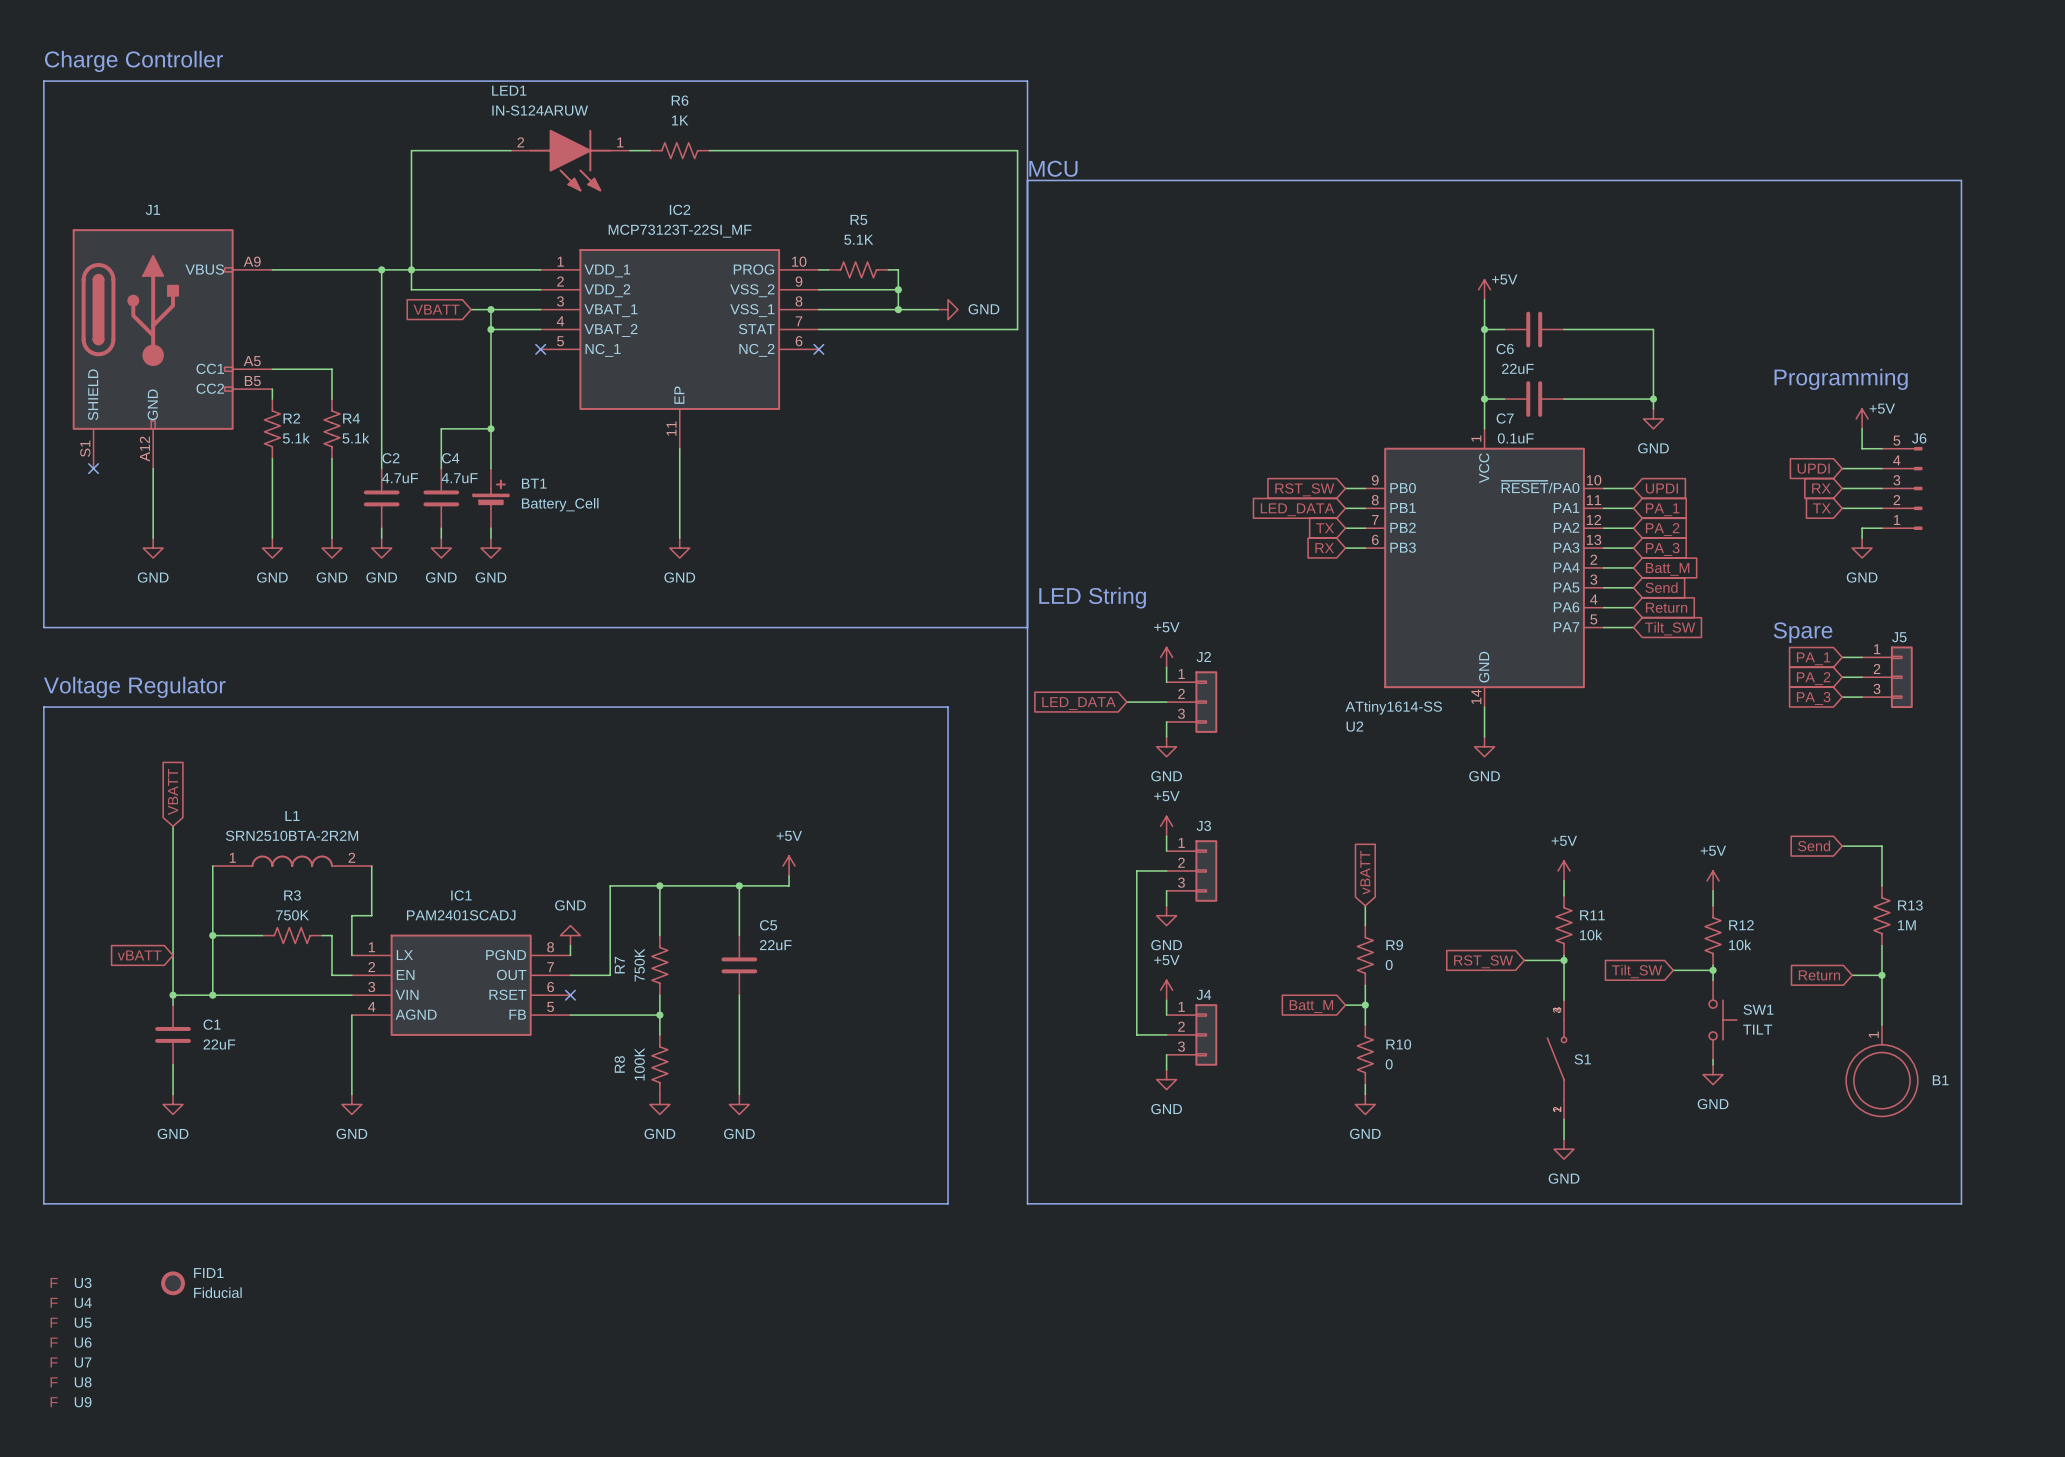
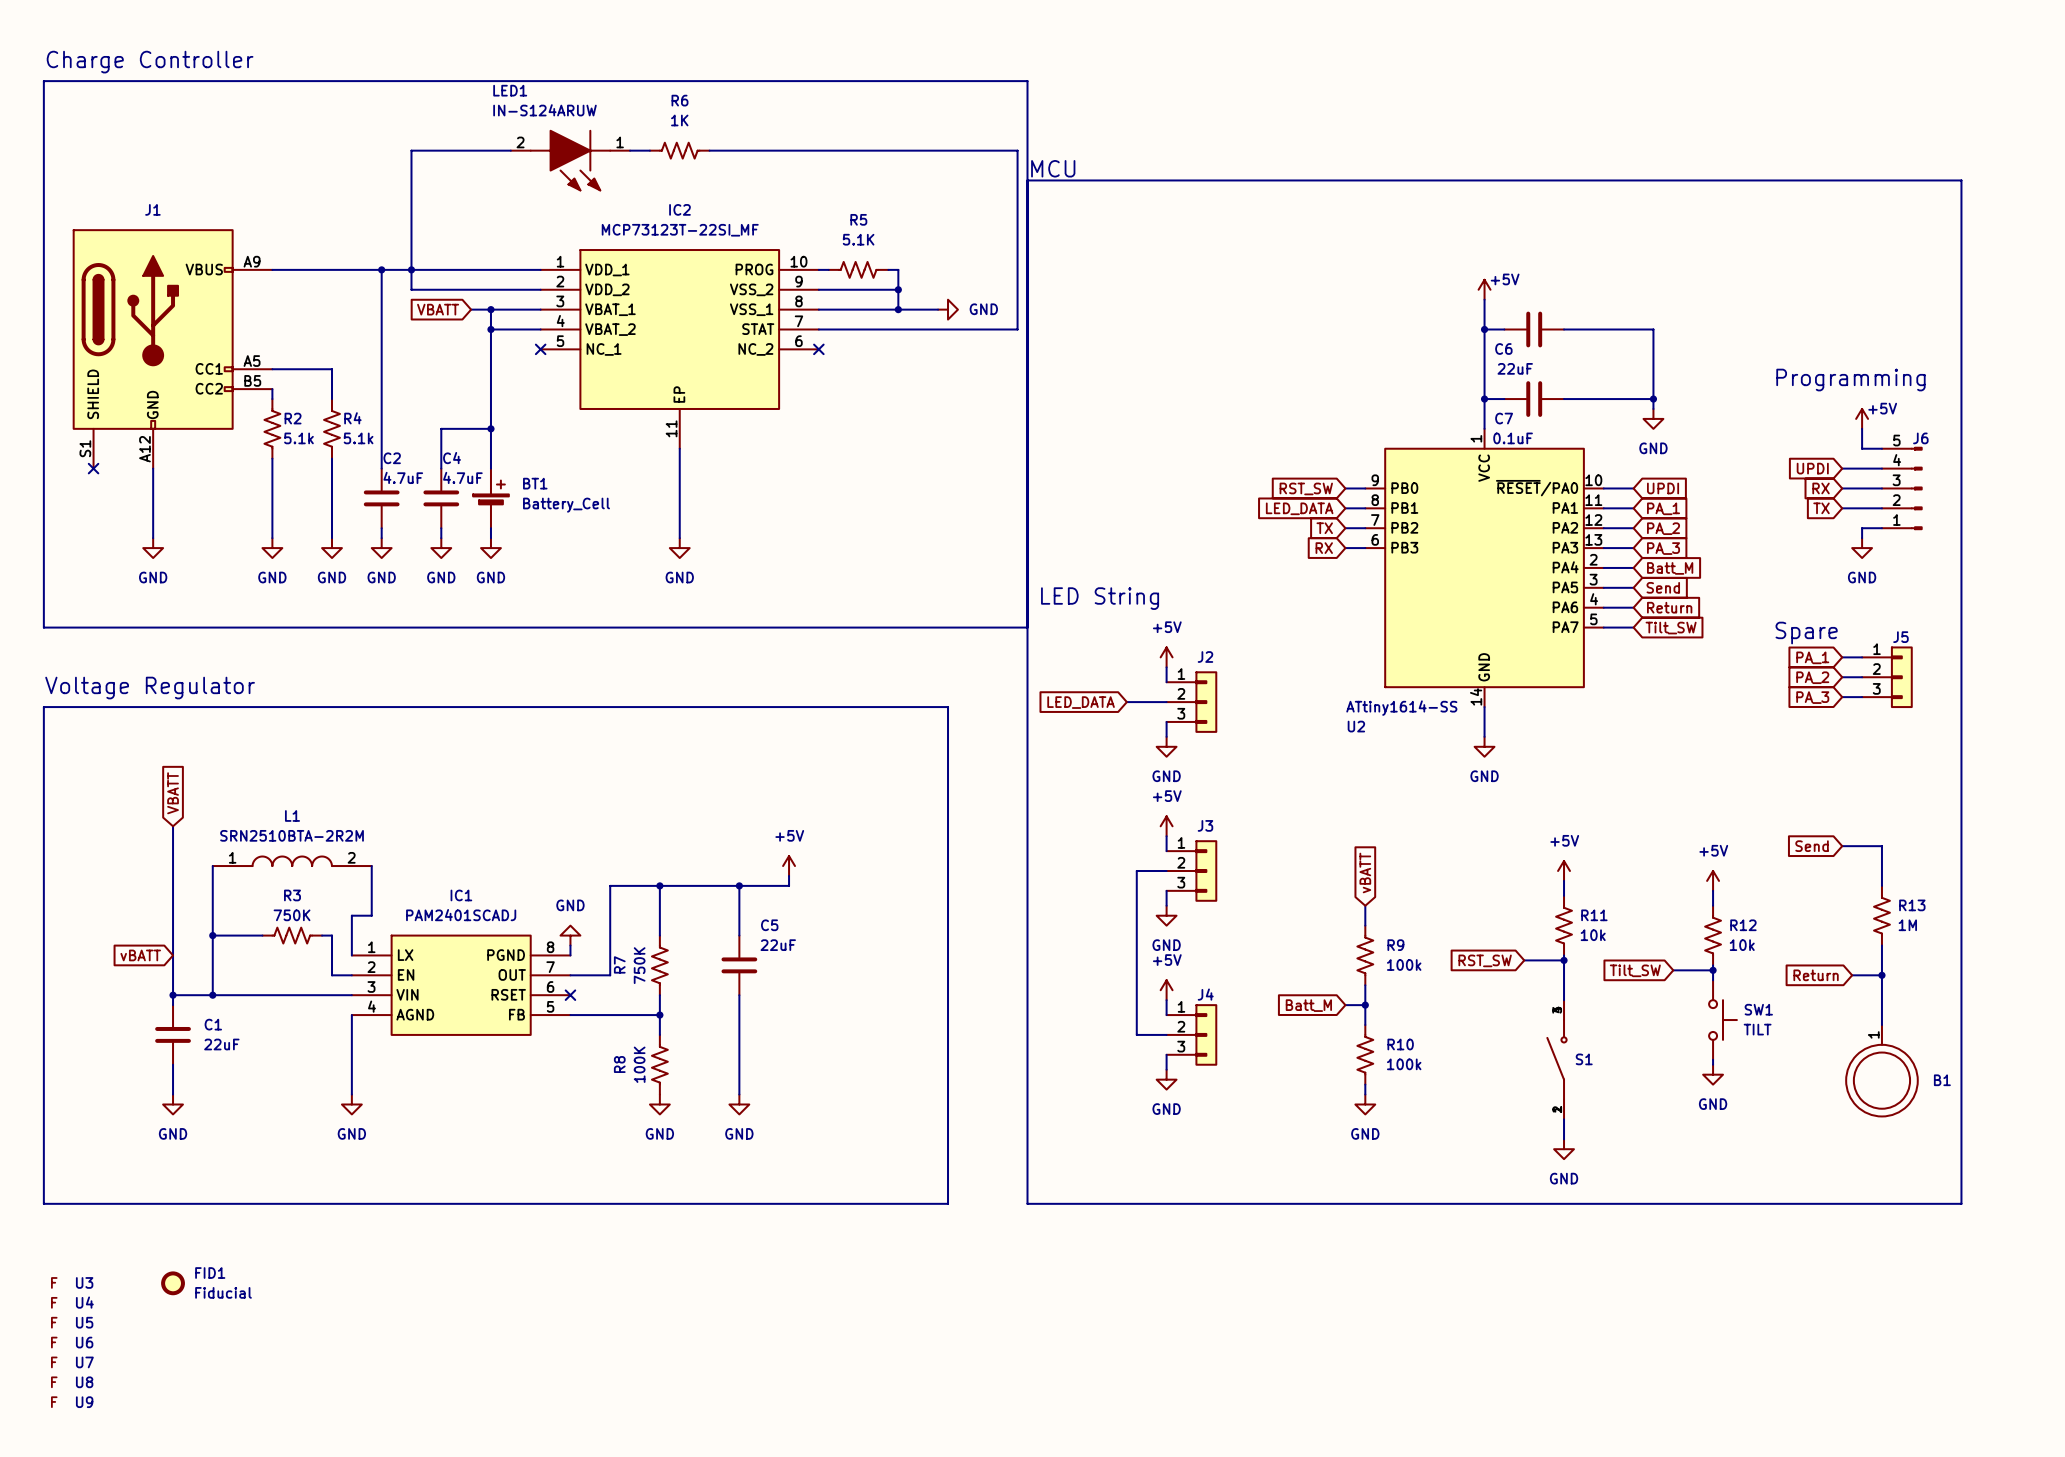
R9 value: 0 (1389, 965) -> 100k (1404, 965)
R10 value: 0 (1389, 1064) -> 100k (1404, 1064)

